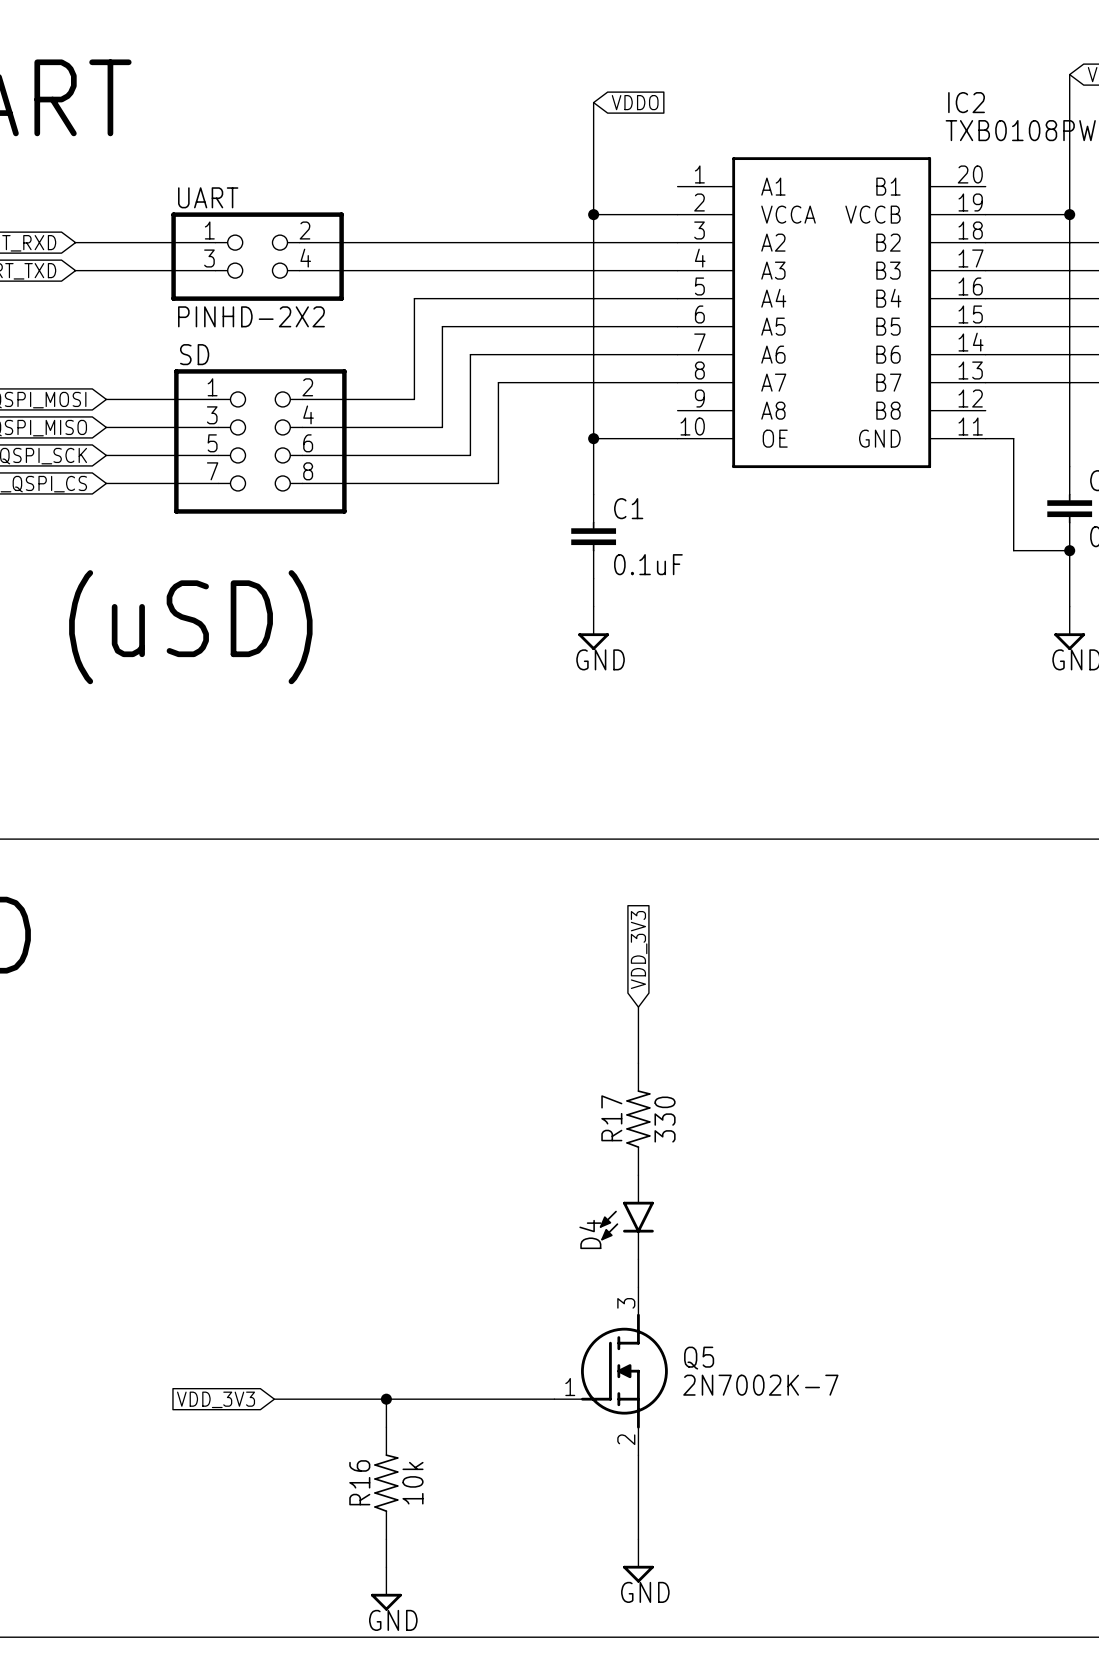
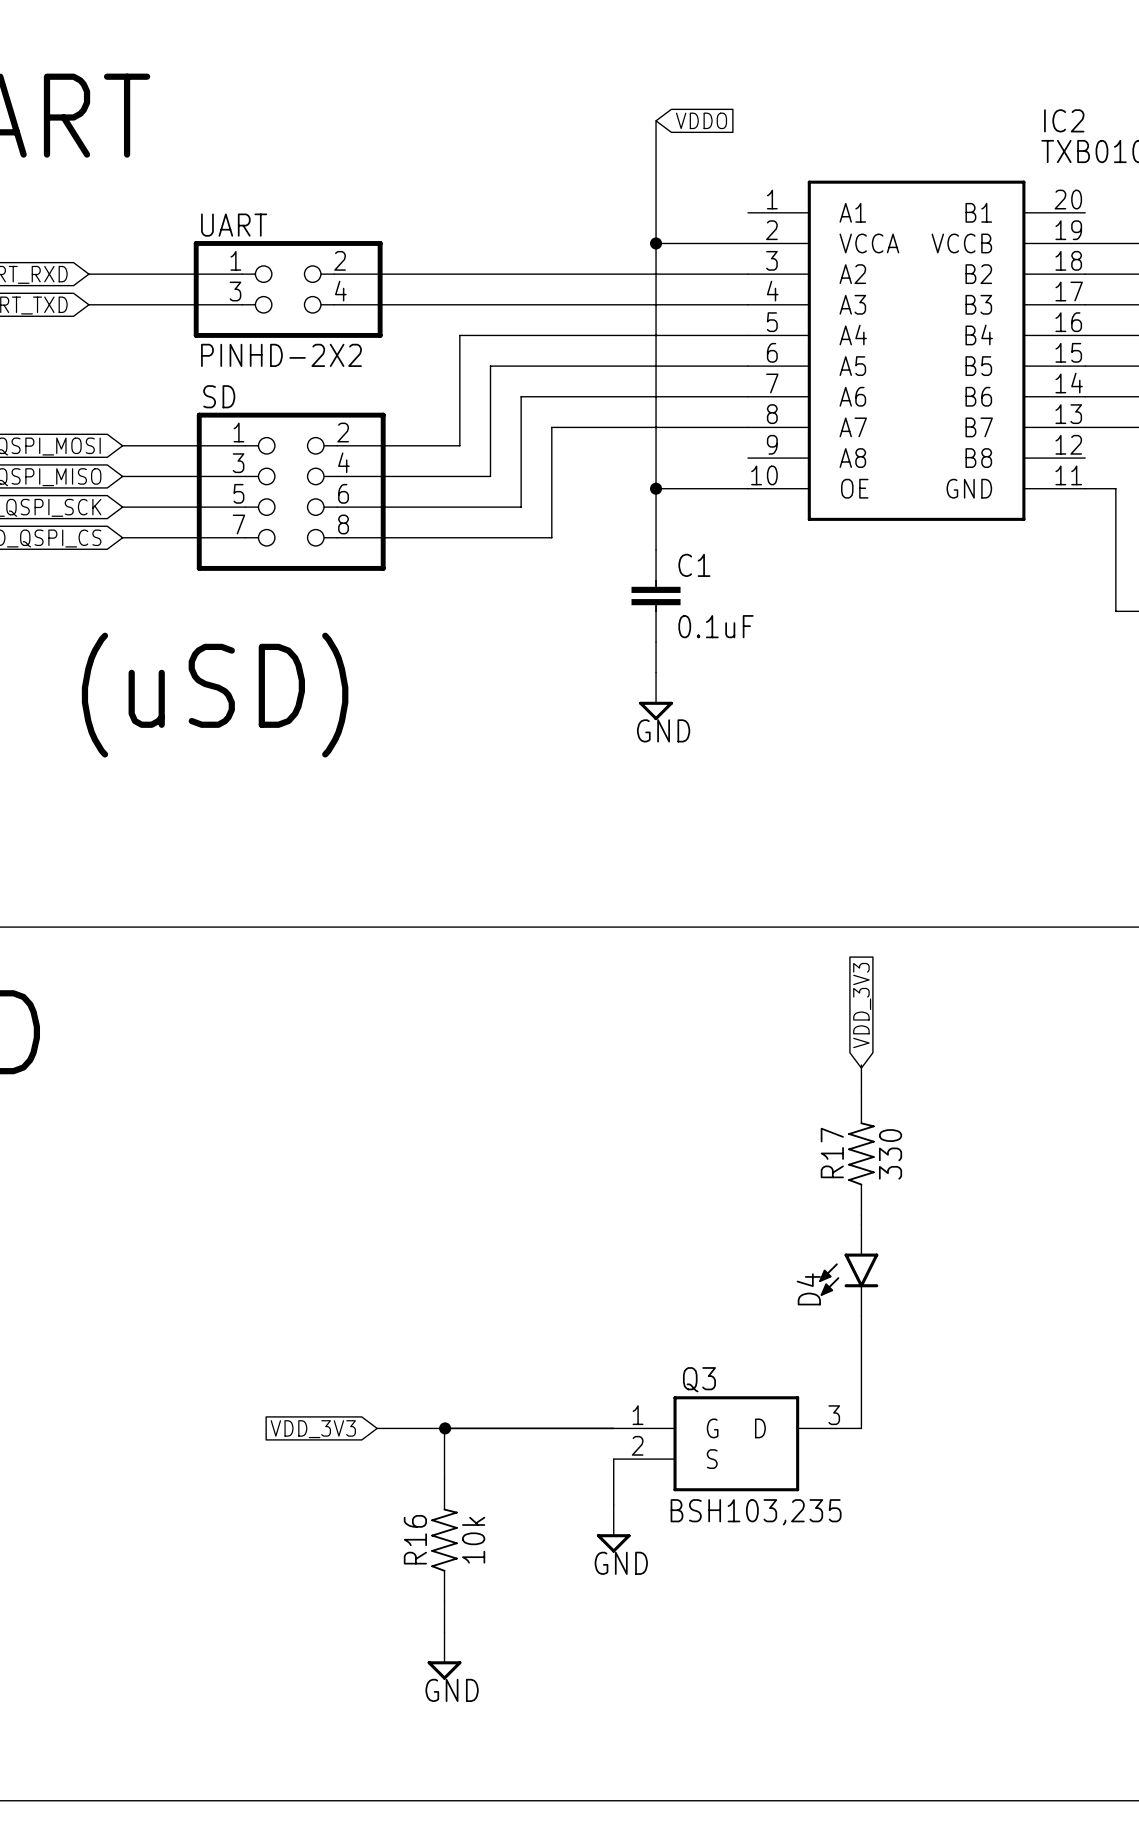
global label position: VDD_3V3 (639, 949) -> VDD_3V3 (862, 1005)
wire: none -> (861, 1065) (861, 1092)
wire: (638, 1007) (638, 1063) -> none
wire: none -> (861, 1215) (861, 1224)
R17 position: (638, 1119) -> (861, 1153)
wire: none -> (861, 1316) (861, 1428) (858, 1428)
D4 position: (626, 1217) -> (848, 1270)
wire: (638, 1259) (638, 1287) -> none
wire: none -> (377, 1428) (613, 1428)
wire: none -> (444, 1428) (444, 1478)
junction: none -> (445, 1428)
Q3: none -> BSH103,235 (736, 1443)
wire: none -> (613, 1459) (613, 1505)
Q5: 2N7002K-7 (611, 1371) -> none
power symbol: none -> GND (613, 1528)
global label position: VDD_3V3 (216, 1399) -> VDD_3V3 (313, 1429)
wire: (274, 1399) (554, 1399) -> none
wire: (386, 1399) (386, 1427) -> (444, 1601) (444, 1632)
junction: (386, 1399) -> none
wire: (638, 1455) (638, 1539) -> none
R16 position: (386, 1483) -> (444, 1540)
wire: (386, 1539) (386, 1567) -> none
power symbol: GND (638, 1560) -> none
power symbol position: GND (386, 1588) -> GND (444, 1655)

